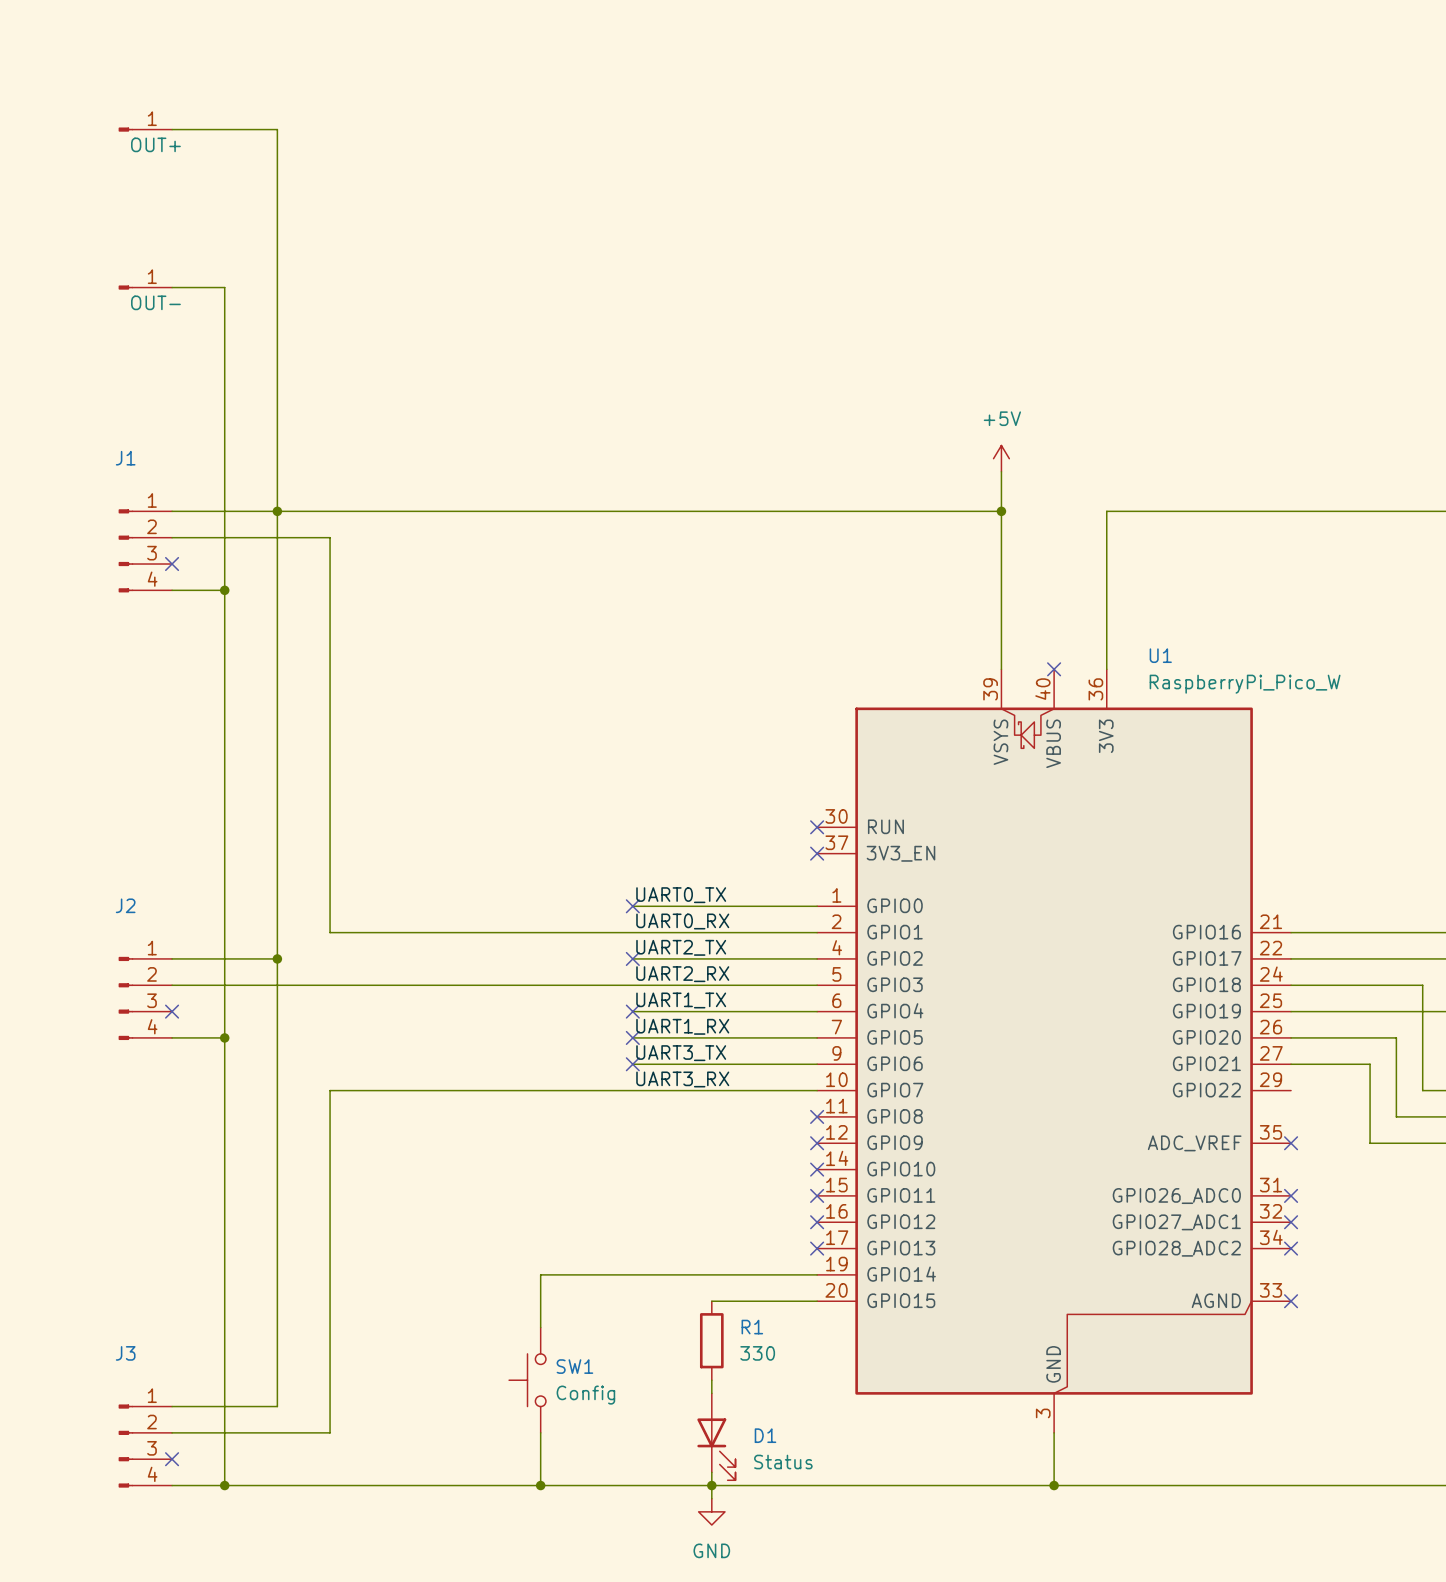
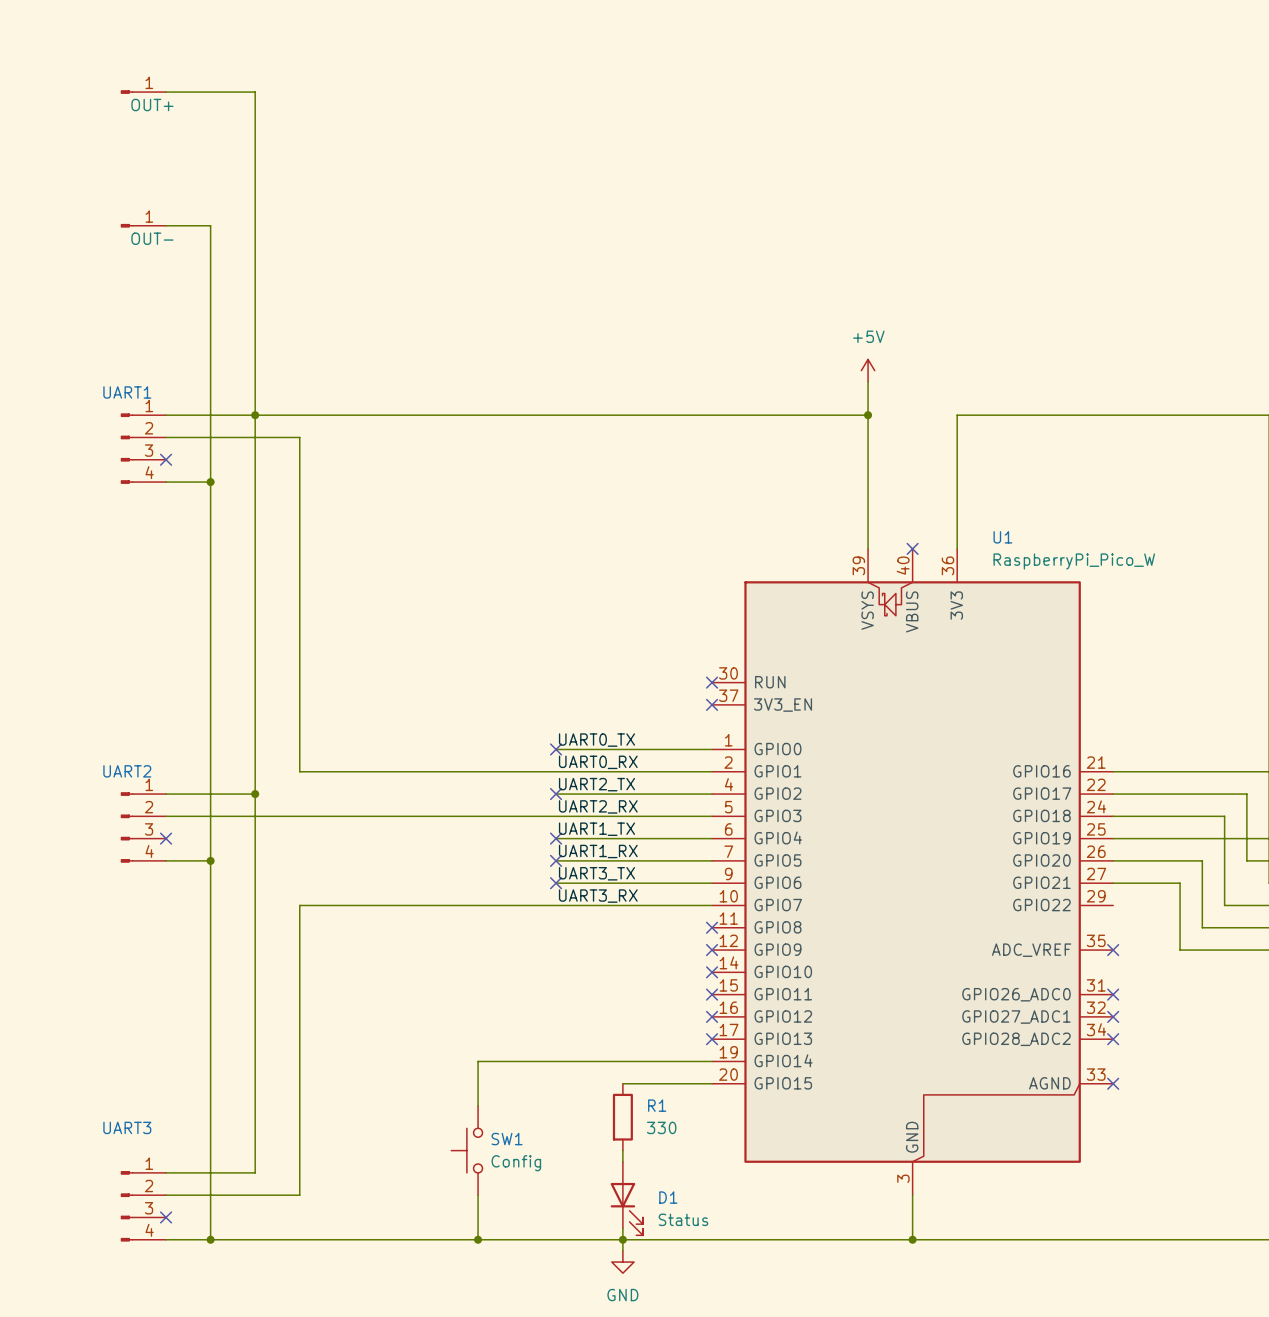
J1 name: J1 (125, 458) -> UART1 (127, 392)
J2 name: J2 (125, 905) -> UART2 (127, 771)
J3 name: J3 (125, 1353) -> UART3 (127, 1127)

